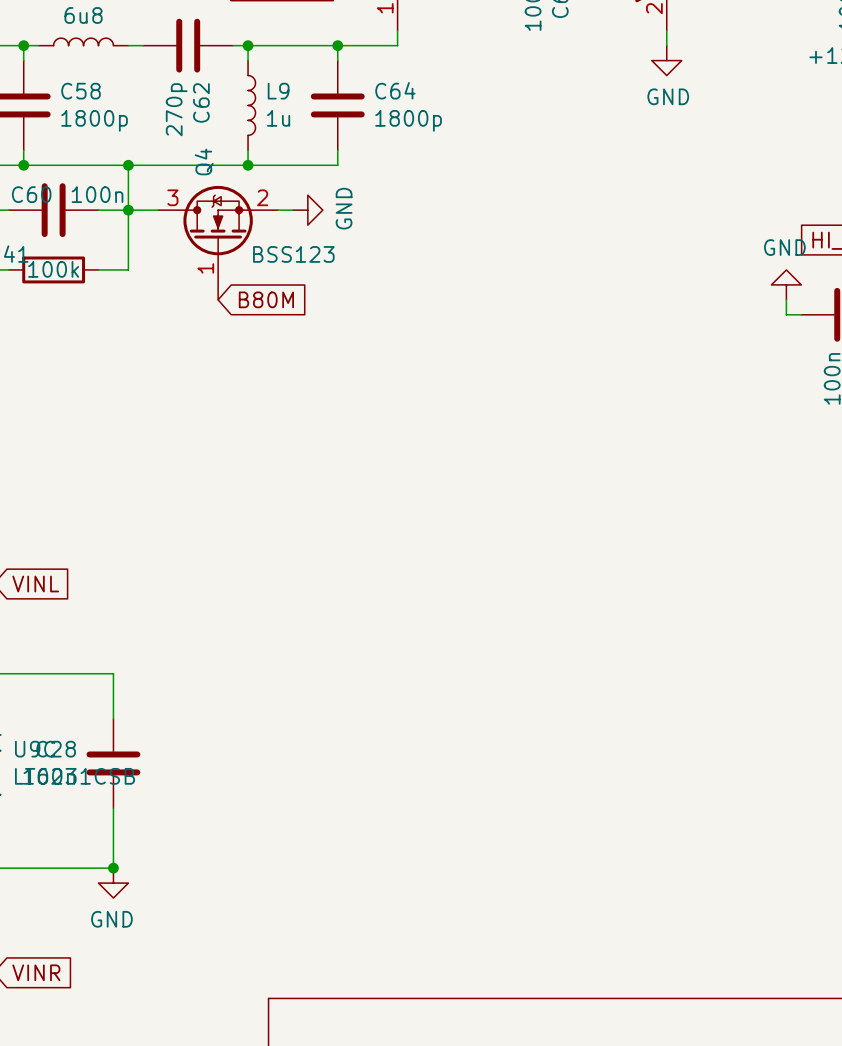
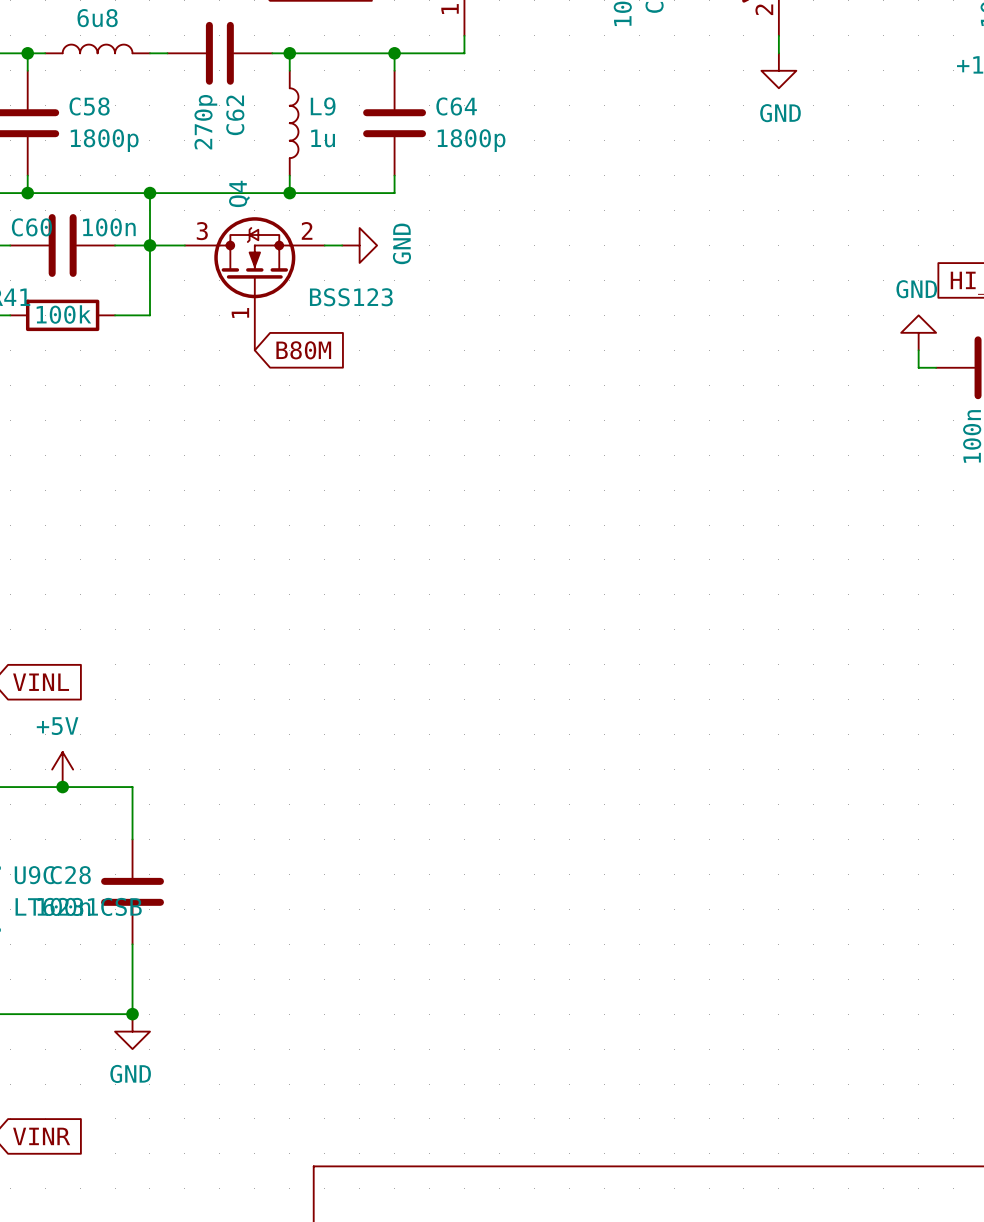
power symbol: none -> +5V (62, 769)
junction: none -> (62, 787)

